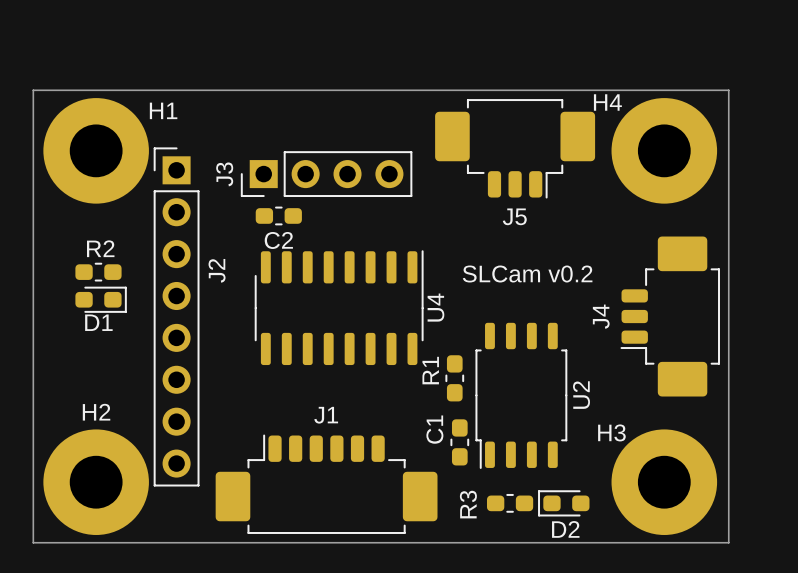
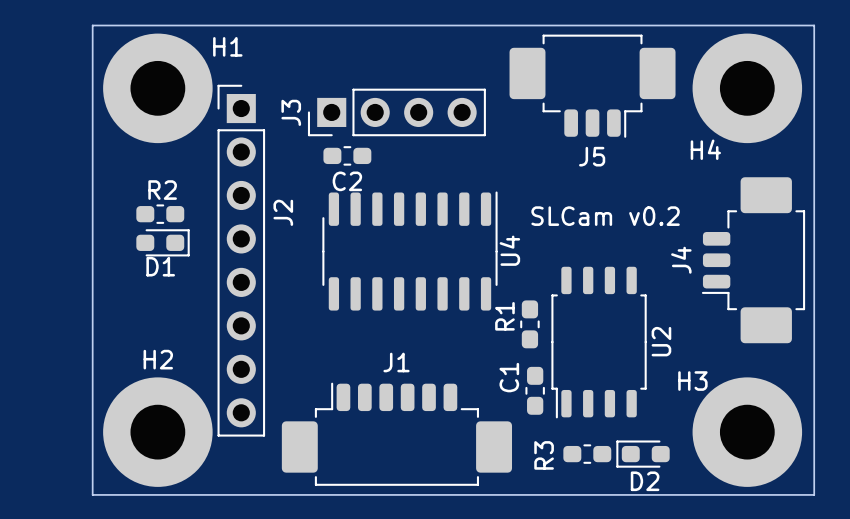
H4 name position: H4 (607, 102) -> H4 (705, 149)

